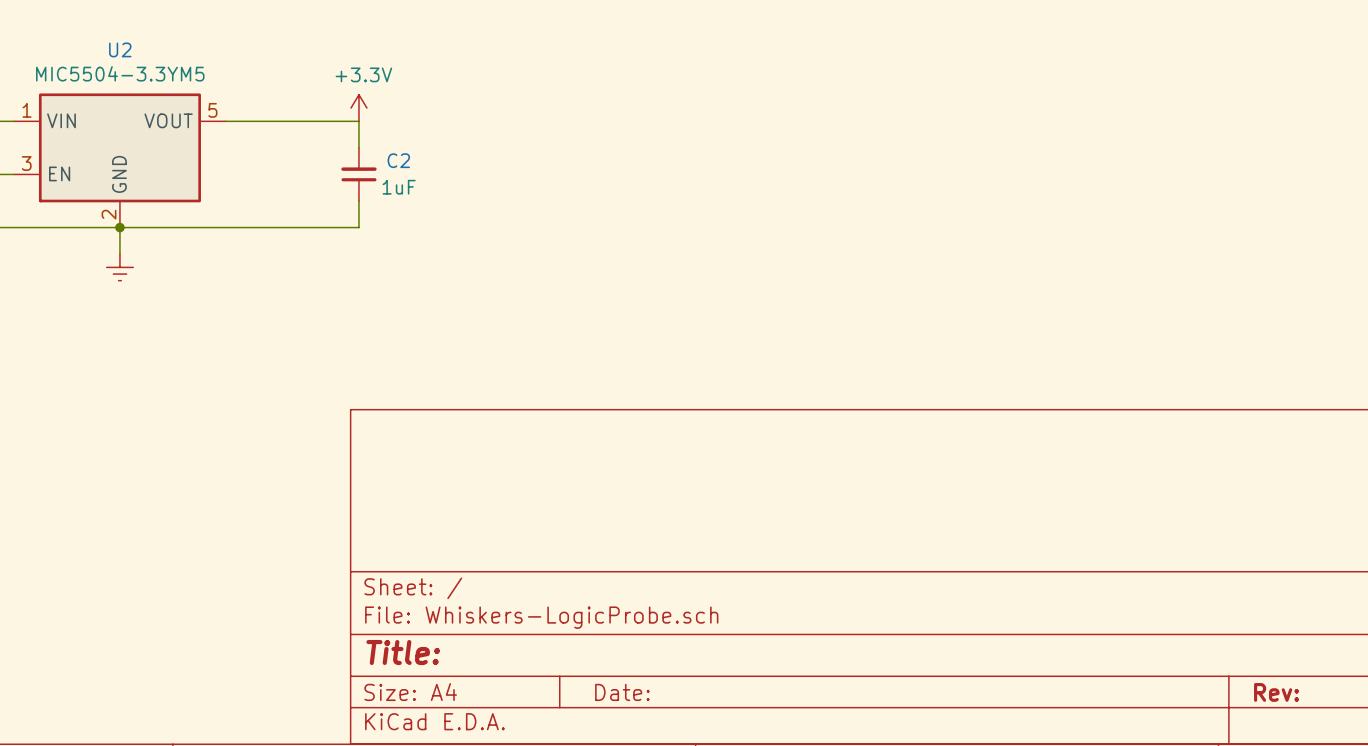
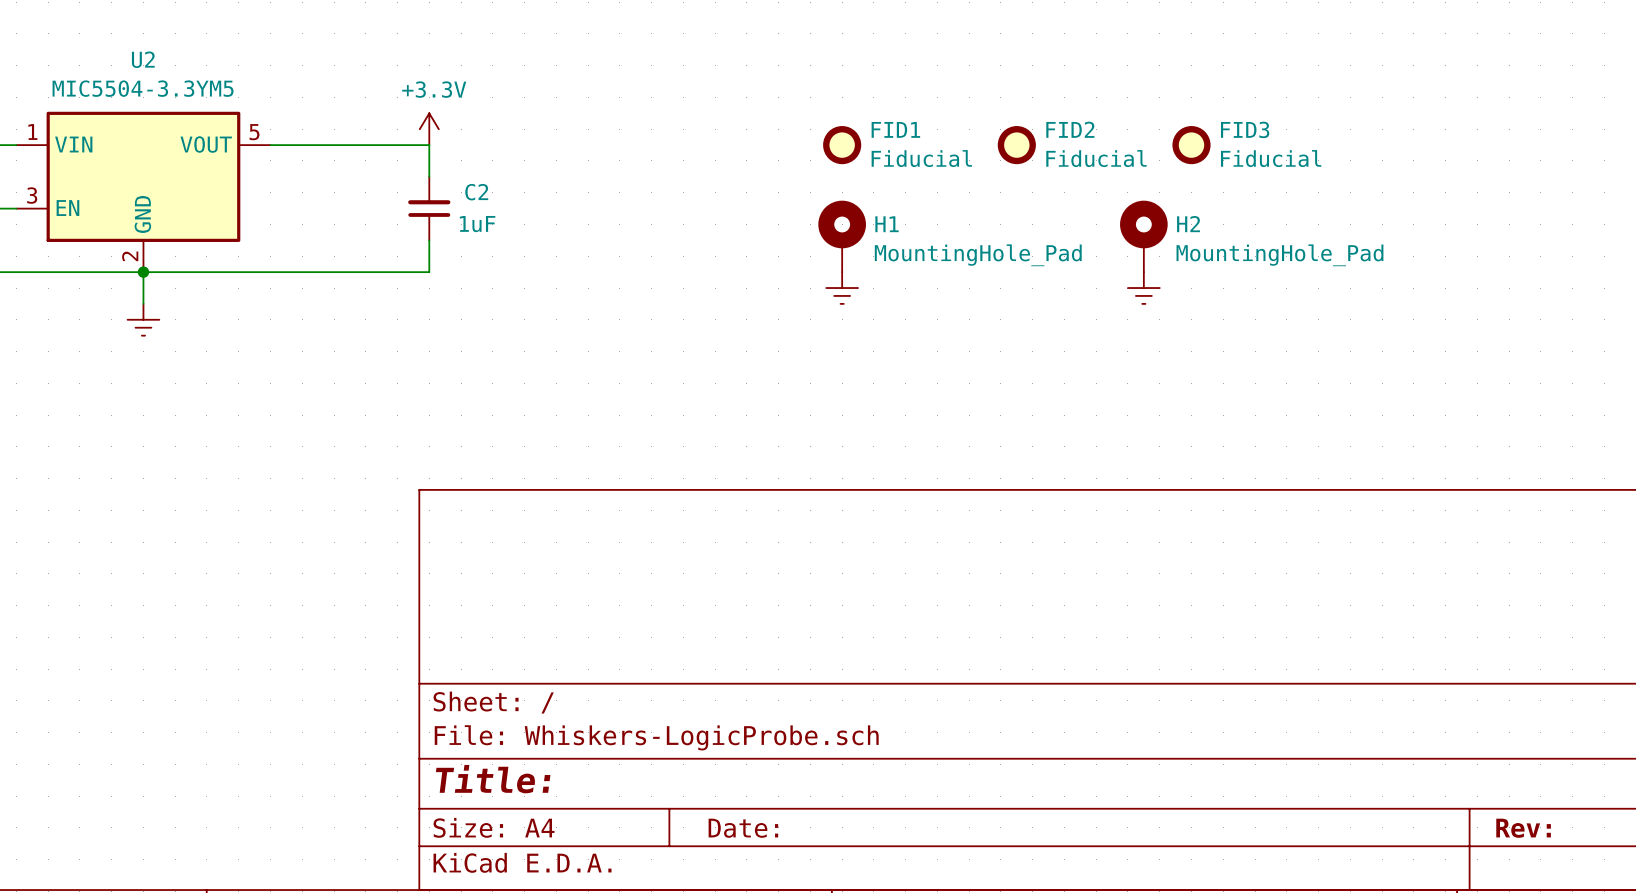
FID1: none -> Fiducial (842, 145)
FID2: none -> Fiducial (1016, 145)
FID3: none -> Fiducial (1191, 145)
H1: none -> MountingHole_Pad (842, 236)
H2: none -> MountingHole_Pad (1143, 236)
power symbol: none -> (842, 288)
power symbol: none -> (1143, 288)

